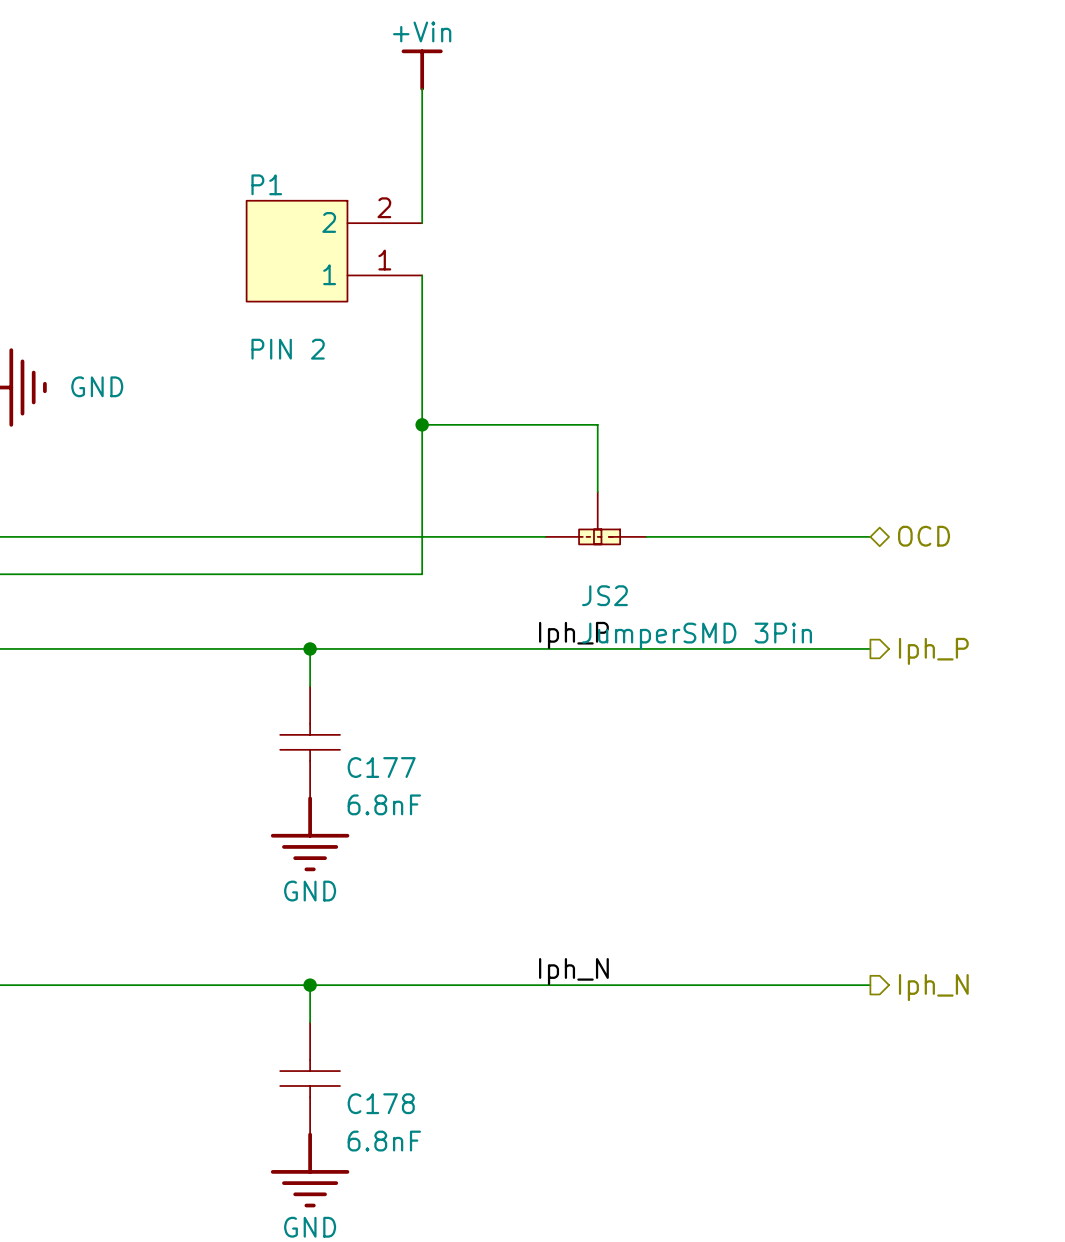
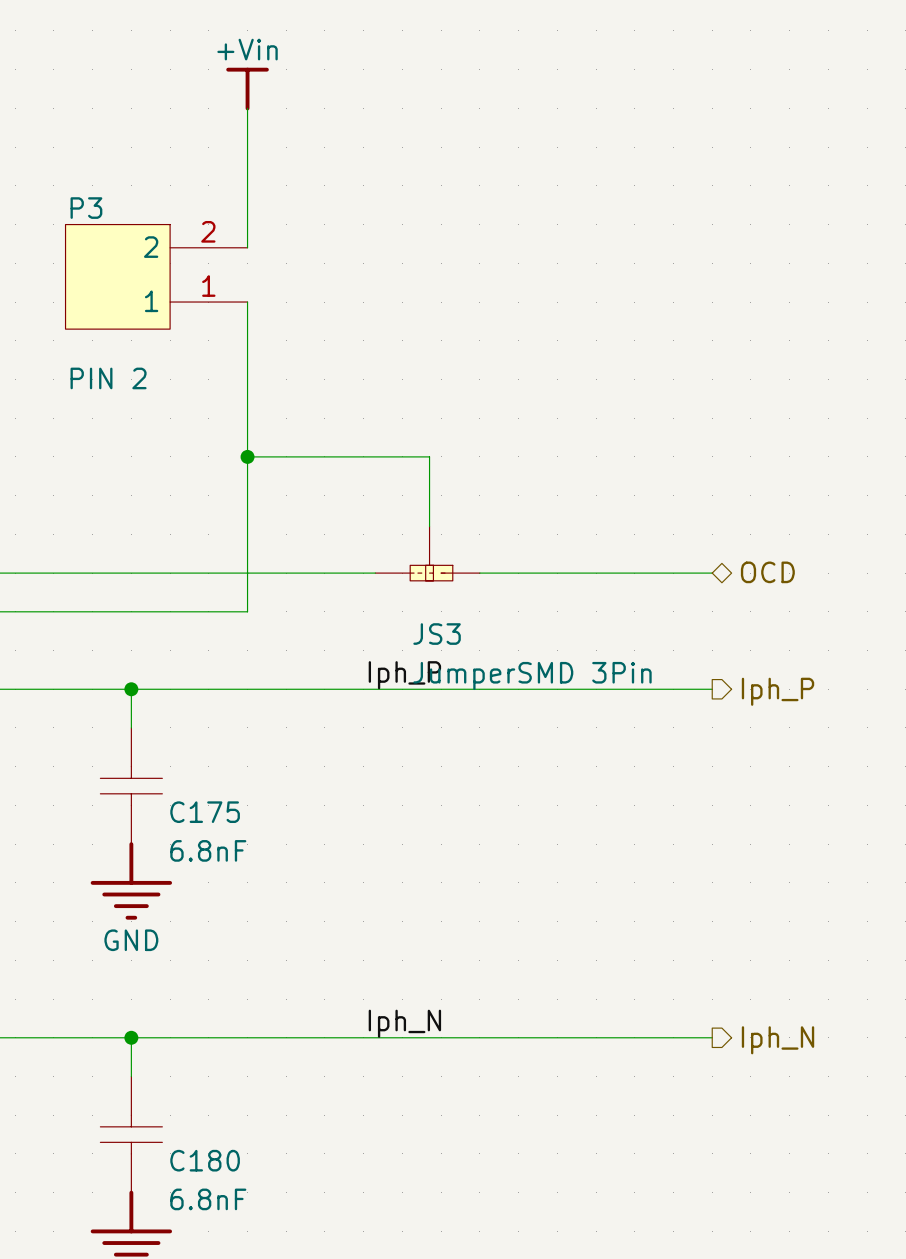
P1 name: P1 (266, 184) -> P3 (86, 208)
JS2 name: JS2 (604, 595) -> JS3 (437, 634)
C177 name: C177 (381, 767) -> C175 (205, 812)
C178 name: C178 (381, 1103) -> C180 (205, 1160)

